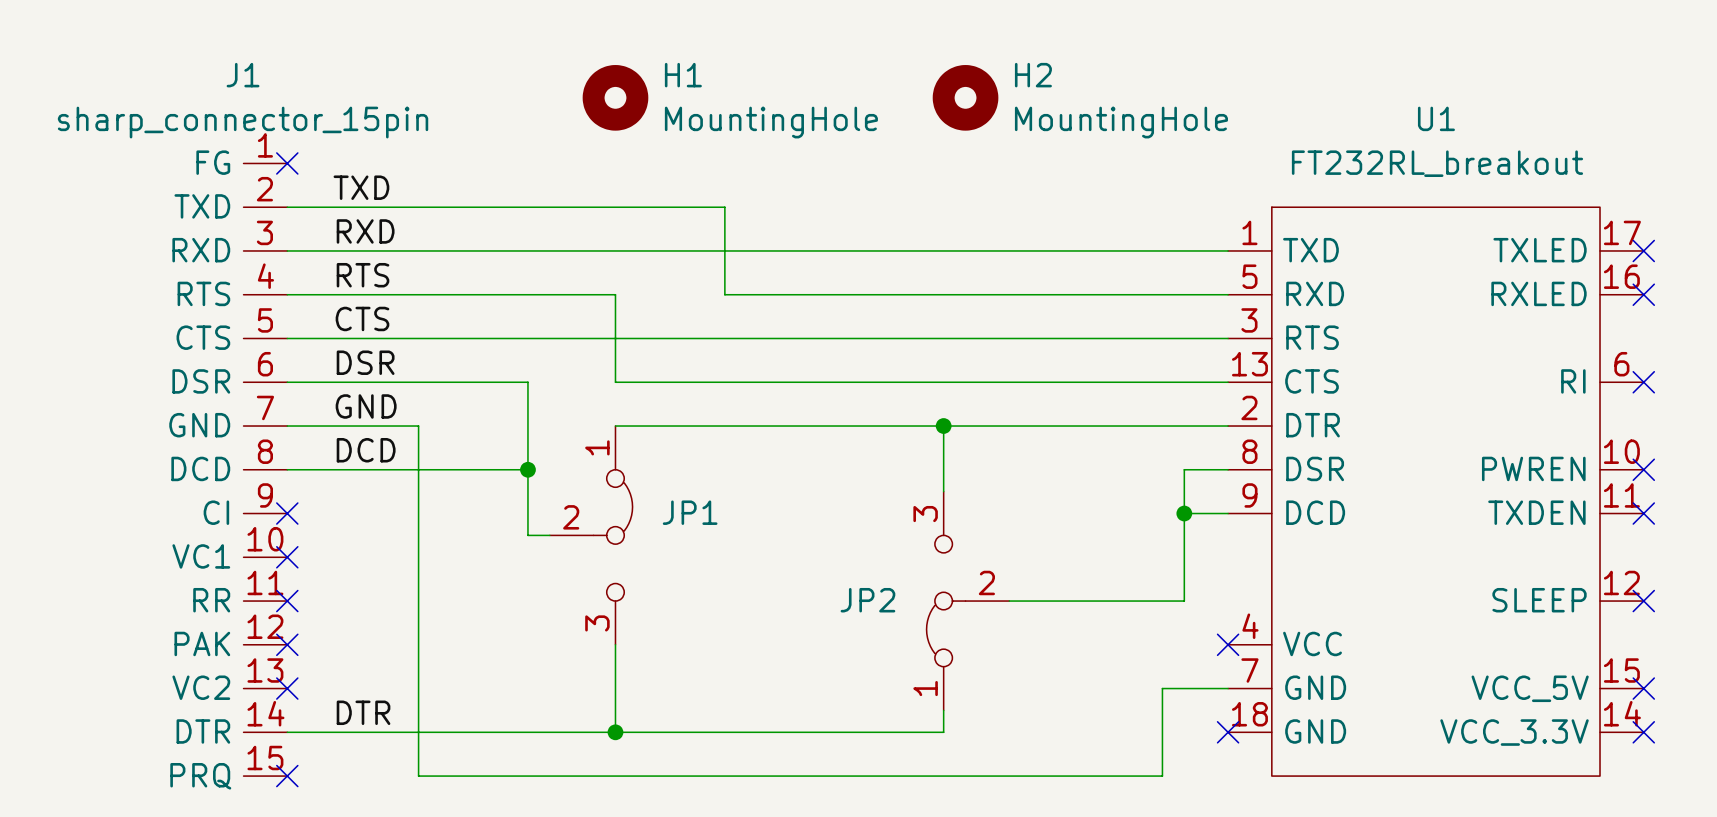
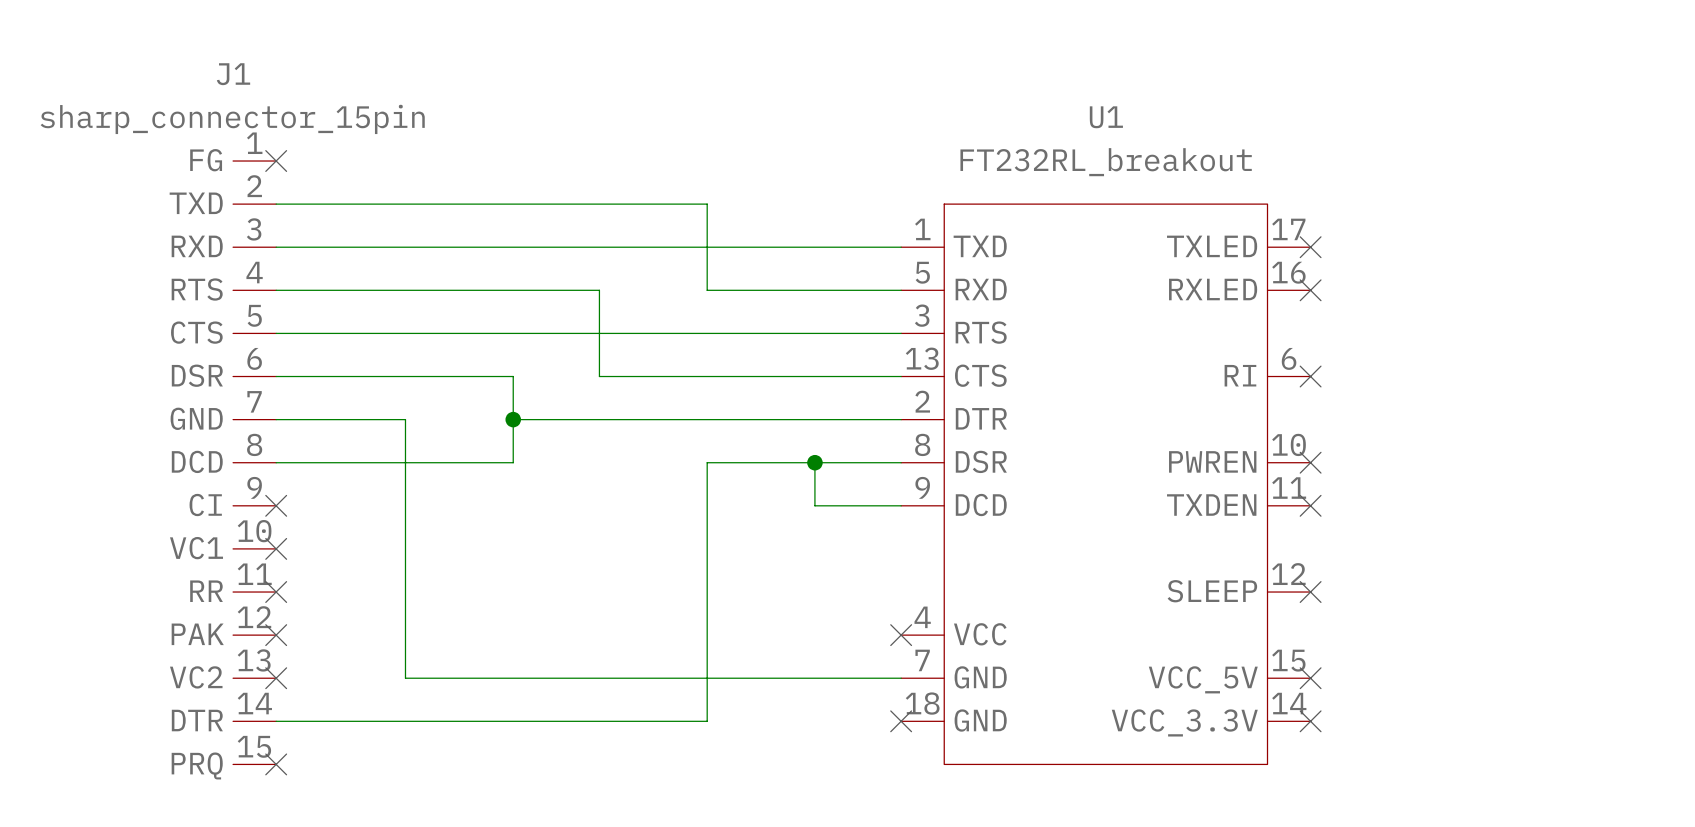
H1: MountingHole (615, 97) -> none
H2: MountingHole (965, 97) -> none
label: TXD (361, 187) -> none
label: RXD (365, 231) -> none
wire: (921, 250) (1228, 250) -> none
no-connect mark: none -> (1310, 247)
no-connect mark: (1643, 250) -> none
label: RTS (363, 275) -> none
wire: (921, 294) (1228, 294) -> none
no-connect mark: none -> (1310, 290)
no-connect mark: (1643, 294) -> none
label: CTS (362, 318) -> none
wire: (921, 338) (1228, 338) -> none
label: DSR (365, 362) -> none
wire: (921, 382) (1228, 382) -> none
no-connect mark: none -> (1310, 376)
no-connect mark: (1643, 382) -> none
label: GND (366, 406) -> none
wire: none -> (513, 419) (599, 419)
wire: (921, 426) (1228, 426) -> none
wire: (943, 426) (943, 491) -> none
junction: (943, 426) -> none
label: DCD (366, 450) -> none
wire: (527, 469) (527, 535) (549, 535) -> none
junction position: (527, 469) -> (513, 419)
wire: none -> (814, 462) (814, 505) (901, 505)
junction: none -> (814, 462)
wire: (1228, 469) (1184, 469) (1184, 601) (1009, 601) -> none
no-connect mark: none -> (1310, 462)
no-connect mark: (1643, 469) -> none
U1 position: (1435, 491) -> (1105, 484)
wire: (1184, 513) (1228, 513) -> none
junction: (1184, 513) -> none
no-connect mark: none -> (1310, 505)
no-connect mark: (1643, 513) -> none
JP1: (591, 535) -> none
JP2: (967, 601) -> none
no-connect mark: none -> (1310, 592)
no-connect mark: (1643, 601) -> none
wire: (615, 644) (615, 732) -> none
no-connect mark: none -> (901, 635)
no-connect mark: (1228, 644) -> none
wire: (418, 688) (418, 776) (1162, 776) (1162, 688) (1228, 688) -> (405, 678) (901, 678)
no-connect mark: none -> (1310, 678)
no-connect mark: (1643, 688) -> none
wire: (943, 710) (943, 732) (724, 732) -> (901, 462) (707, 462) (707, 721)
label: DTR (363, 712) -> none
junction: (615, 732) -> none
no-connect mark: none -> (901, 721)
no-connect mark: (1228, 732) -> none
no-connect mark: none -> (1310, 721)
no-connect mark: (1643, 732) -> none

